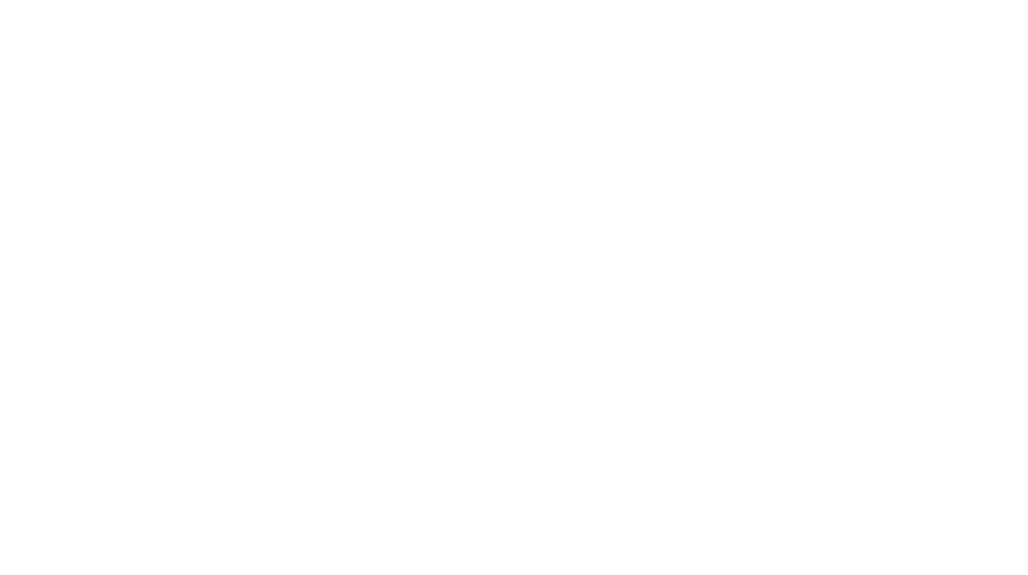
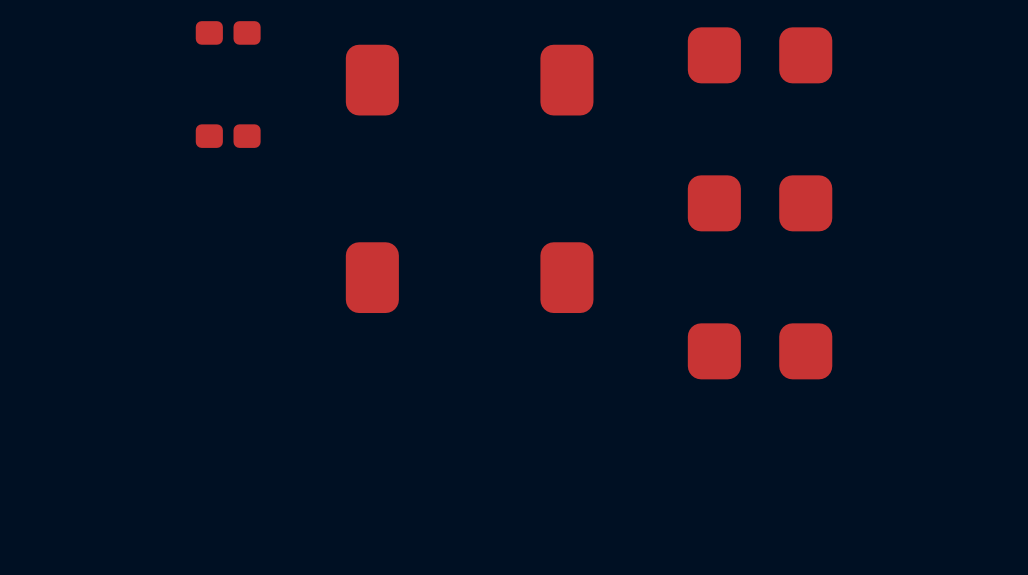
part: none -> (228, 32)
part: none -> (760, 55)
part: none -> (469, 80)
part: none -> (228, 136)
part: none -> (760, 203)
part: none -> (469, 277)
part: none -> (760, 351)

